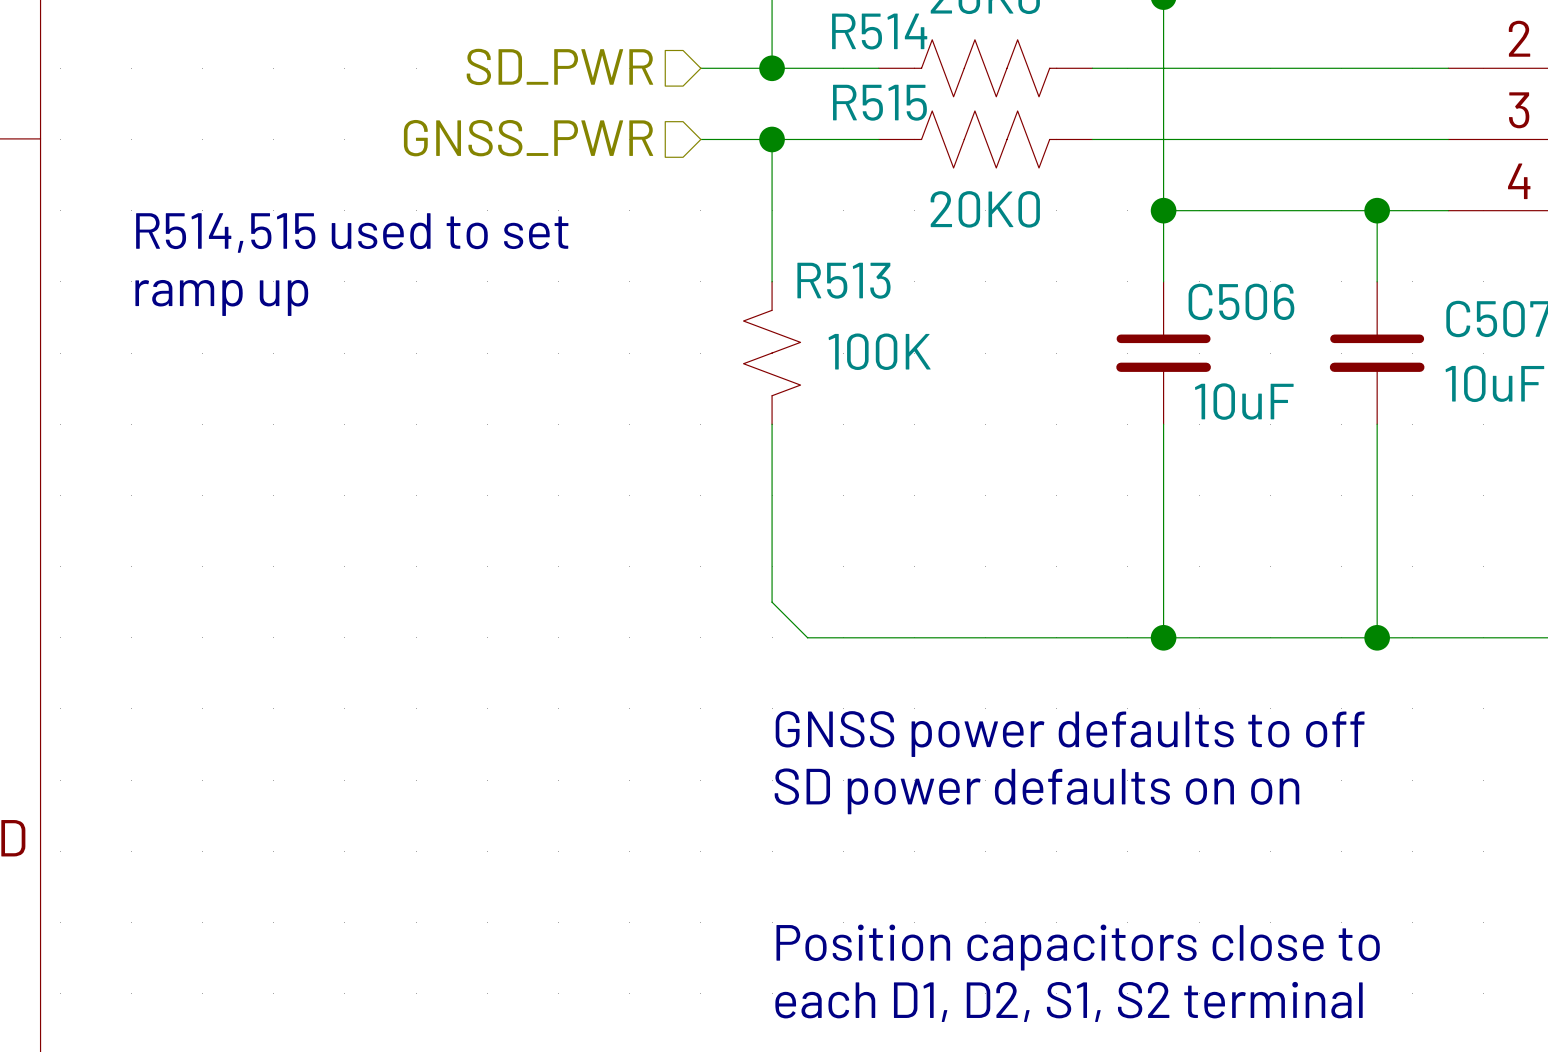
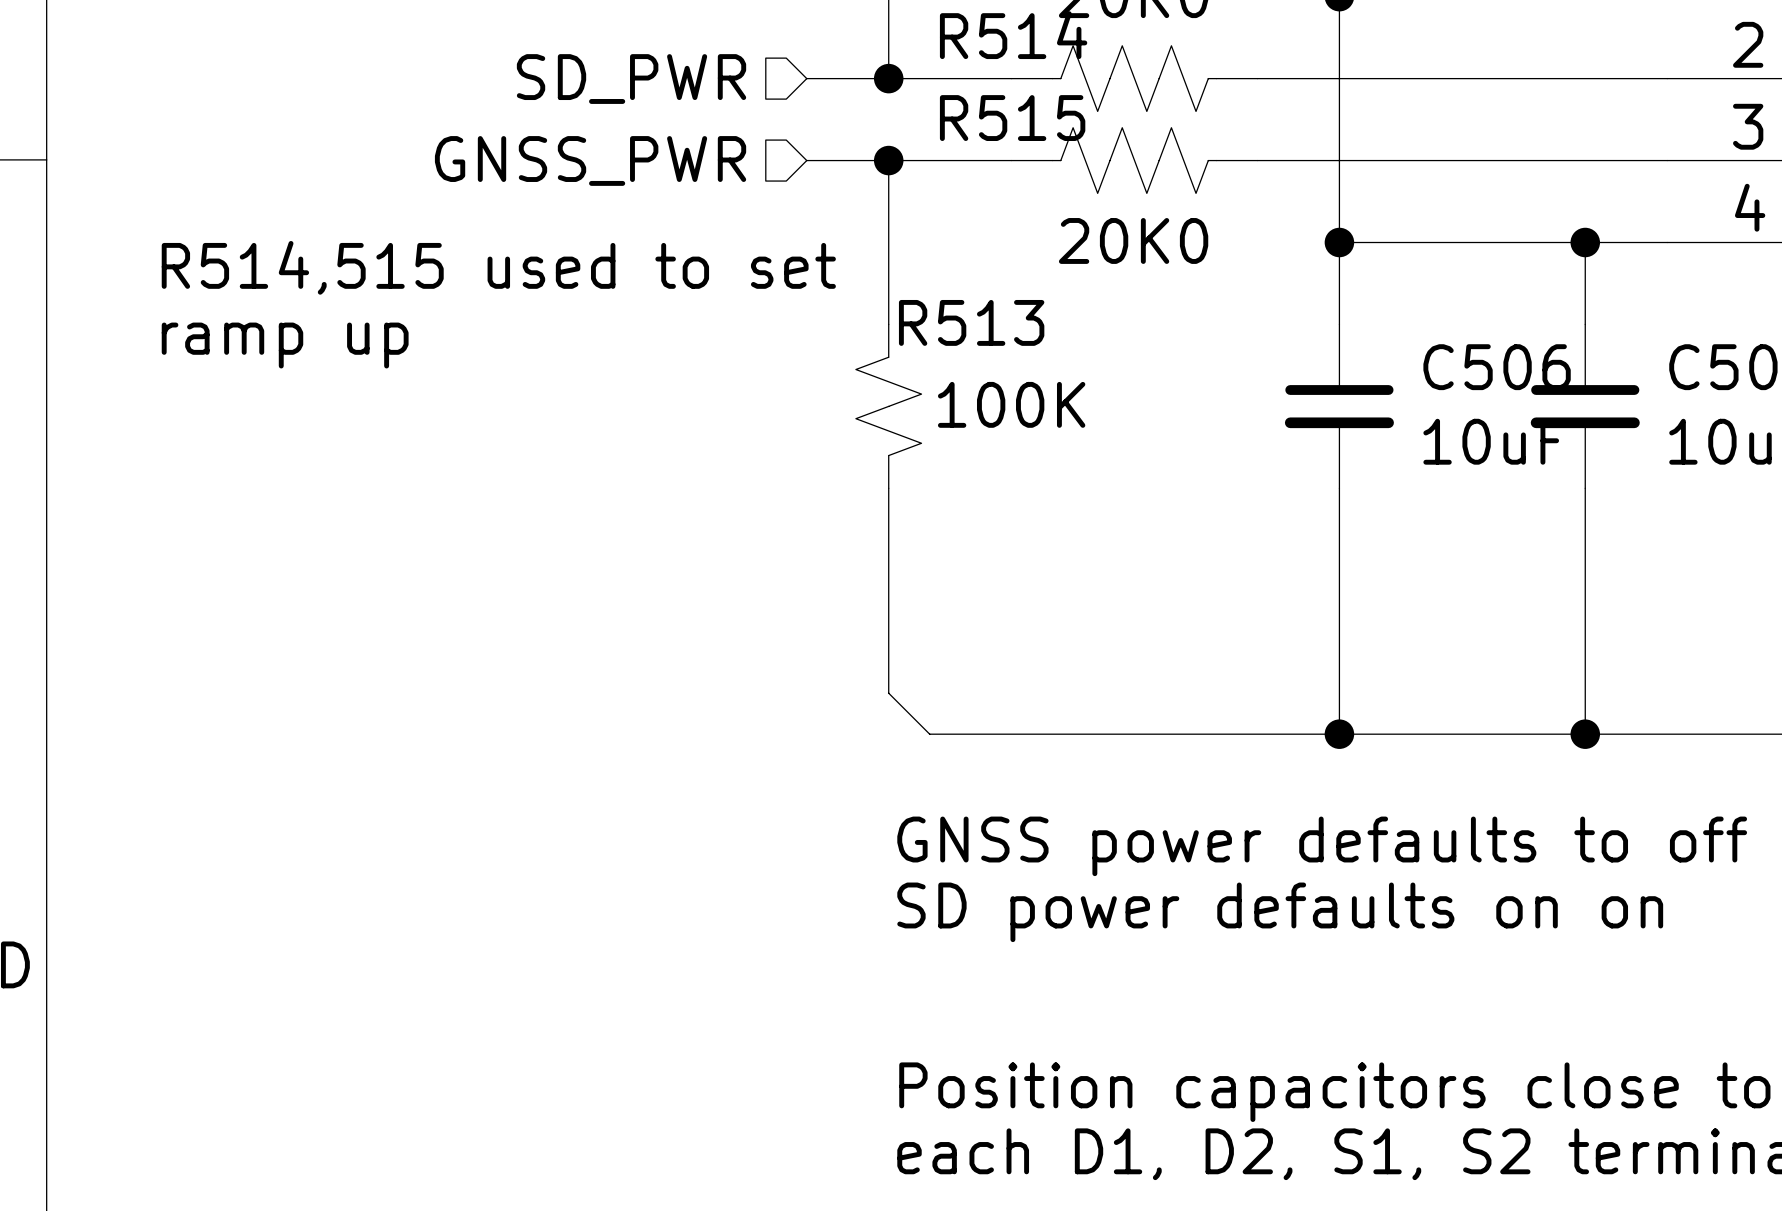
C506 name position: C506 (1241, 301) -> C506 (1497, 367)
C506 value position: 10uF (1244, 401) -> 10uF (1494, 441)

